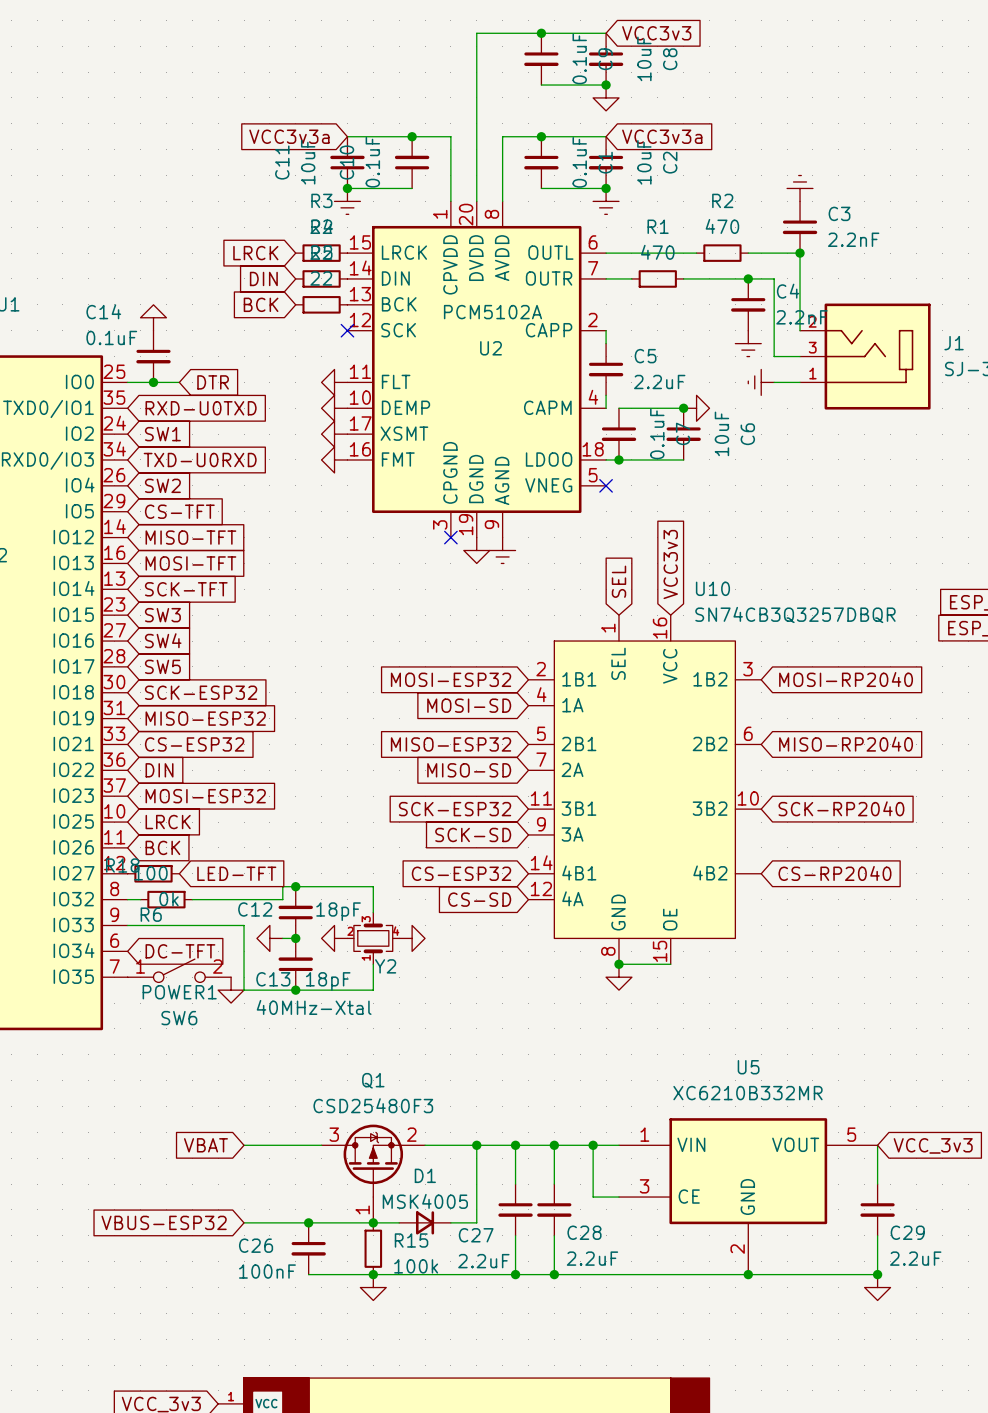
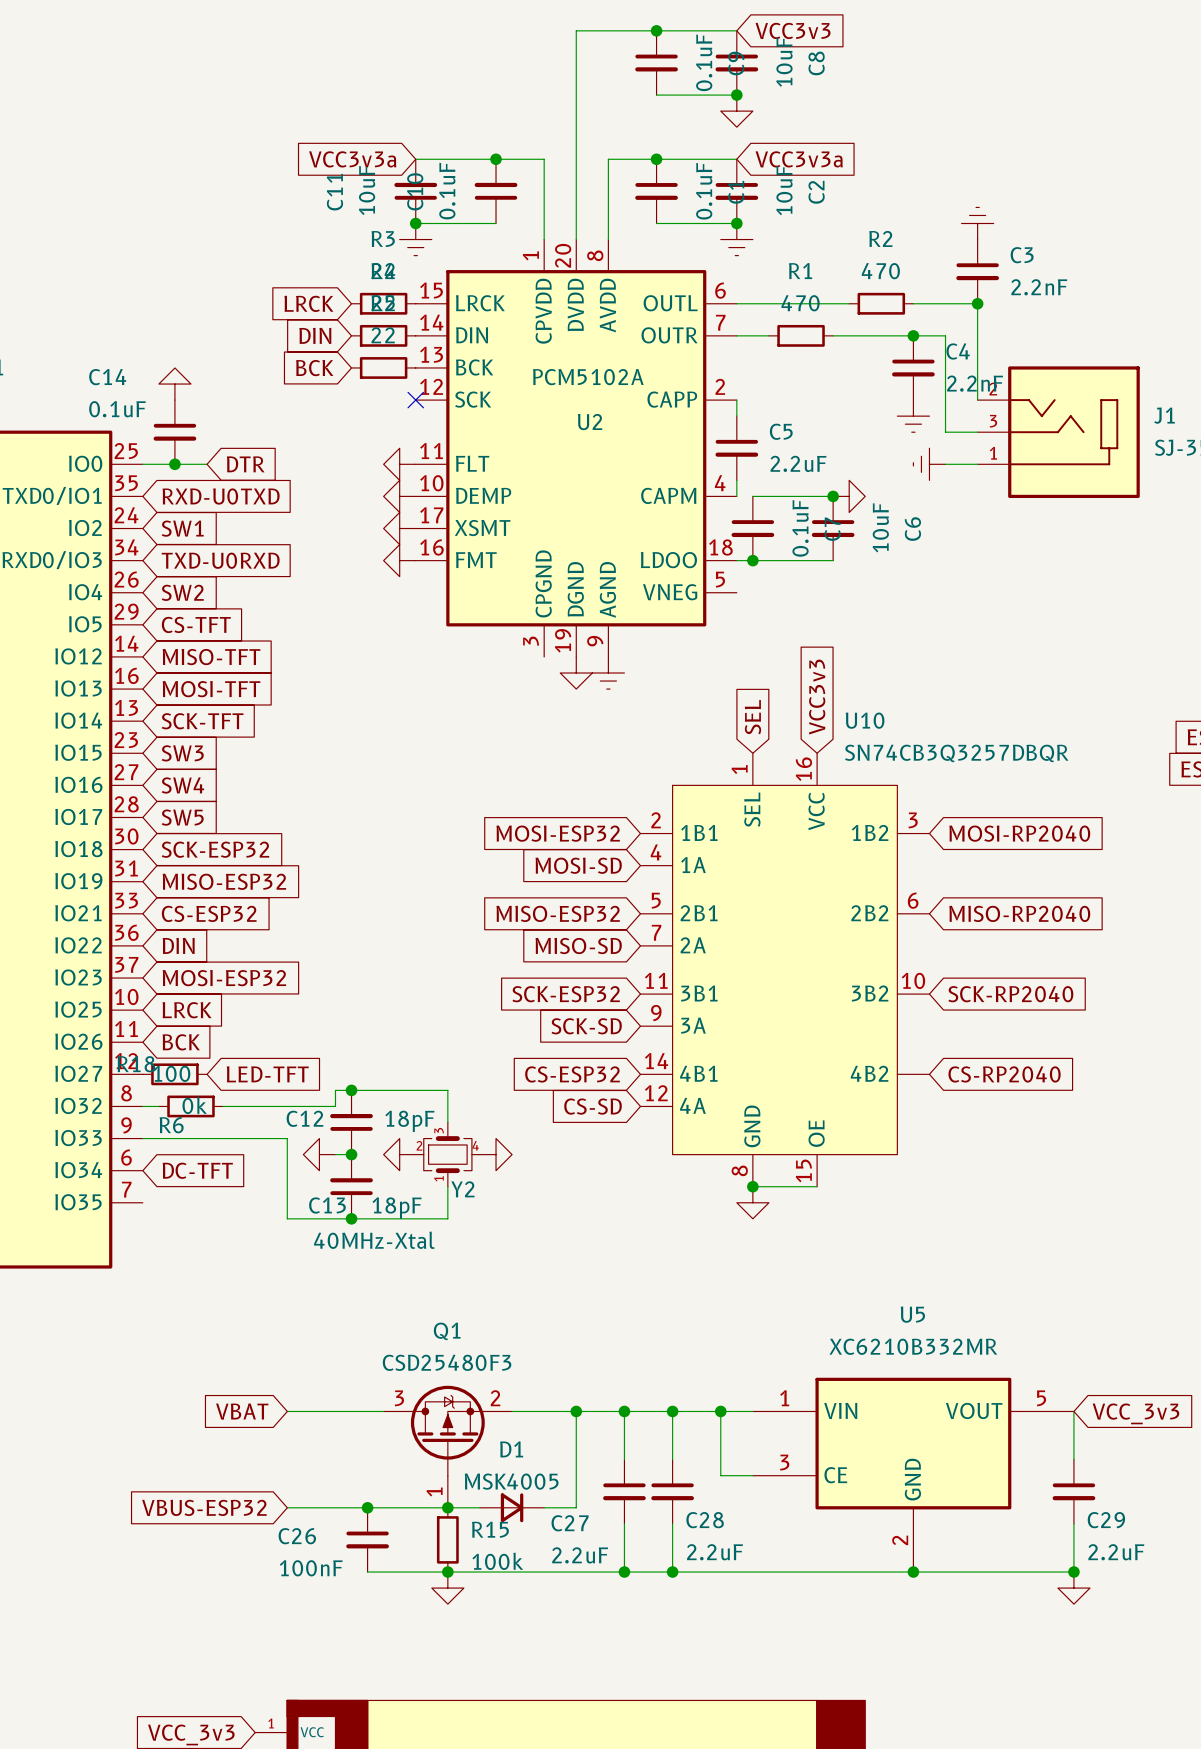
no-connect mark: (606, 485) -> none
no-connect mark: (450, 537) -> none
POWER1: SW6 (179, 970) -> none
power symbol: (231, 990) -> none

